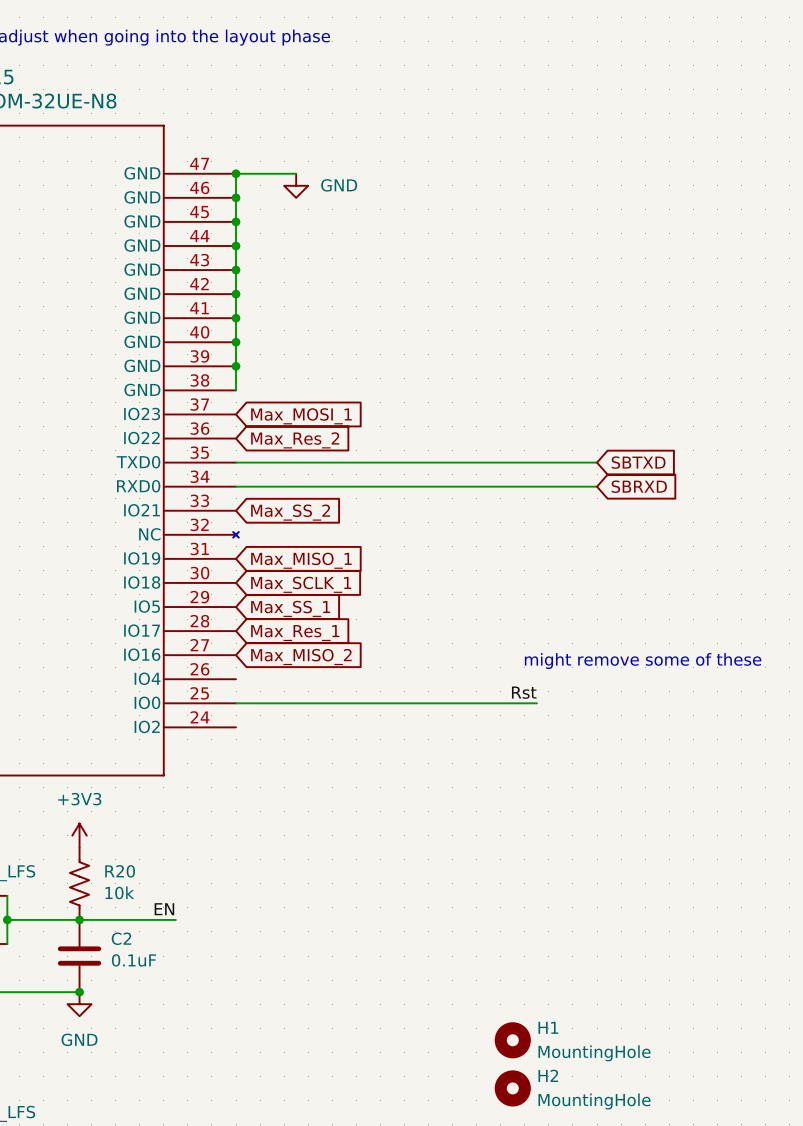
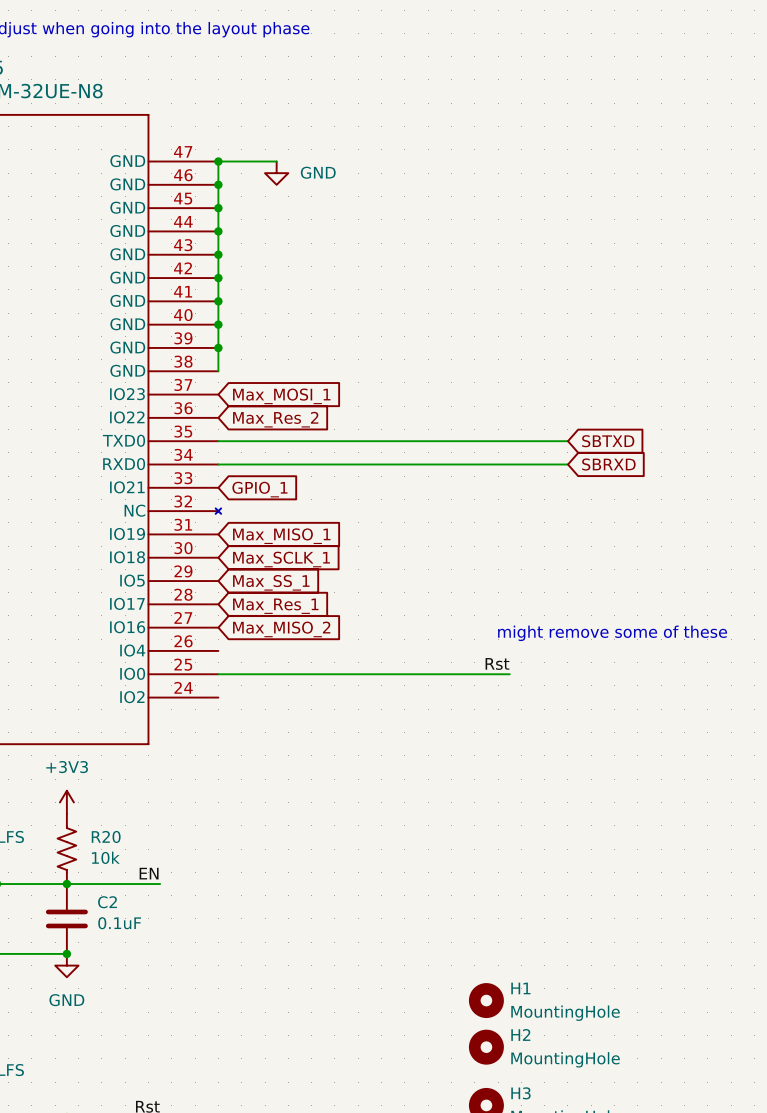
global label: Max_SS_2 (290, 512) -> GPIO_1 (259, 489)

